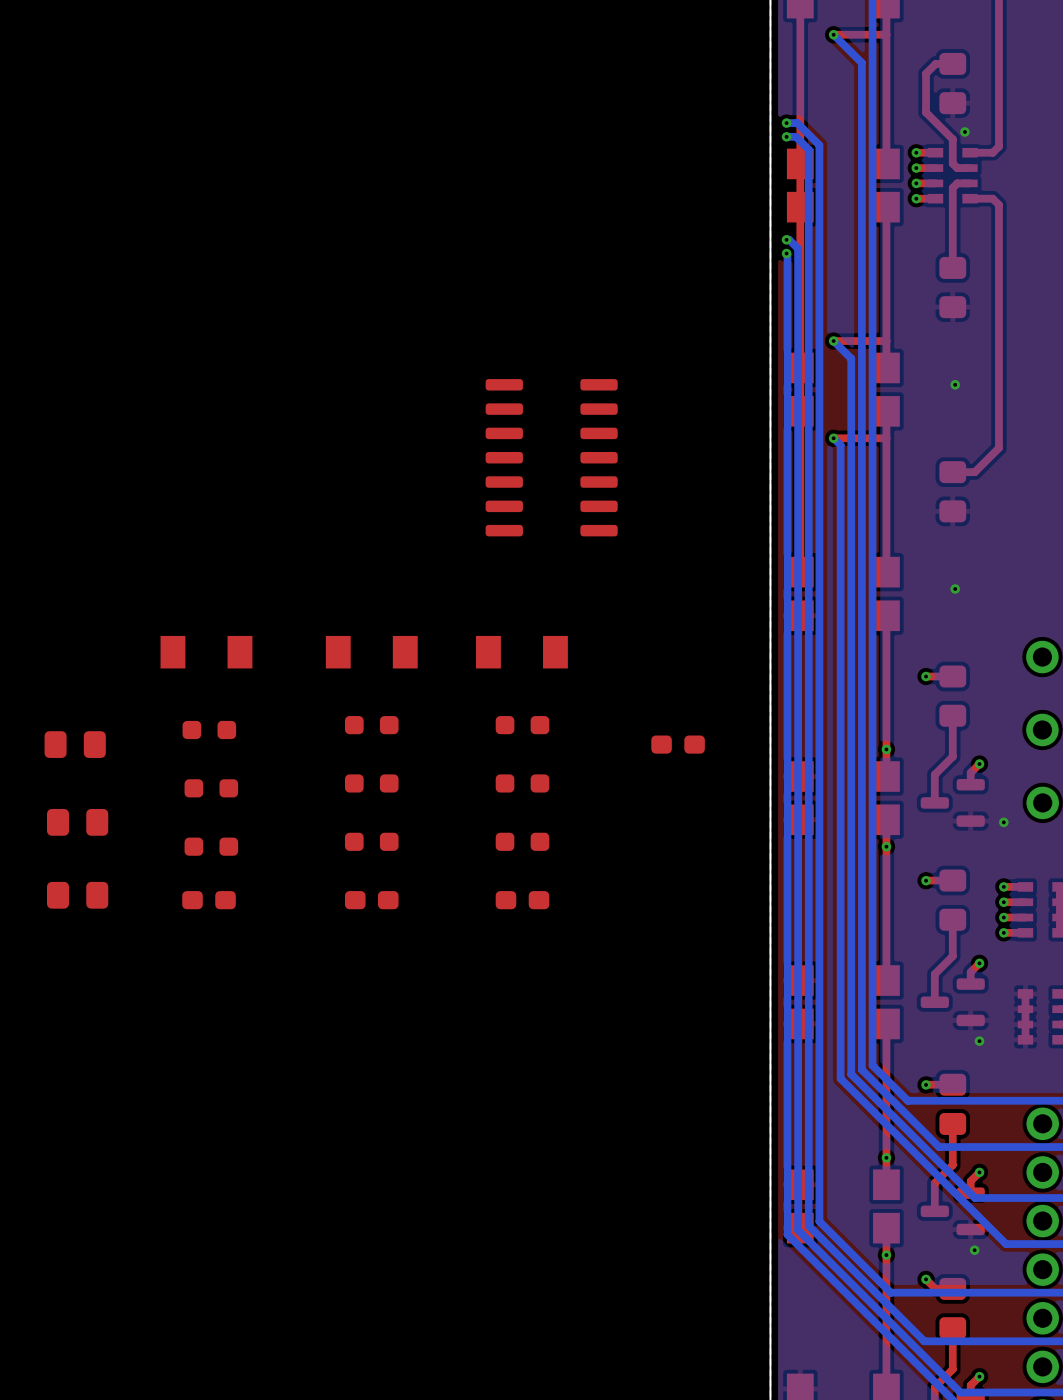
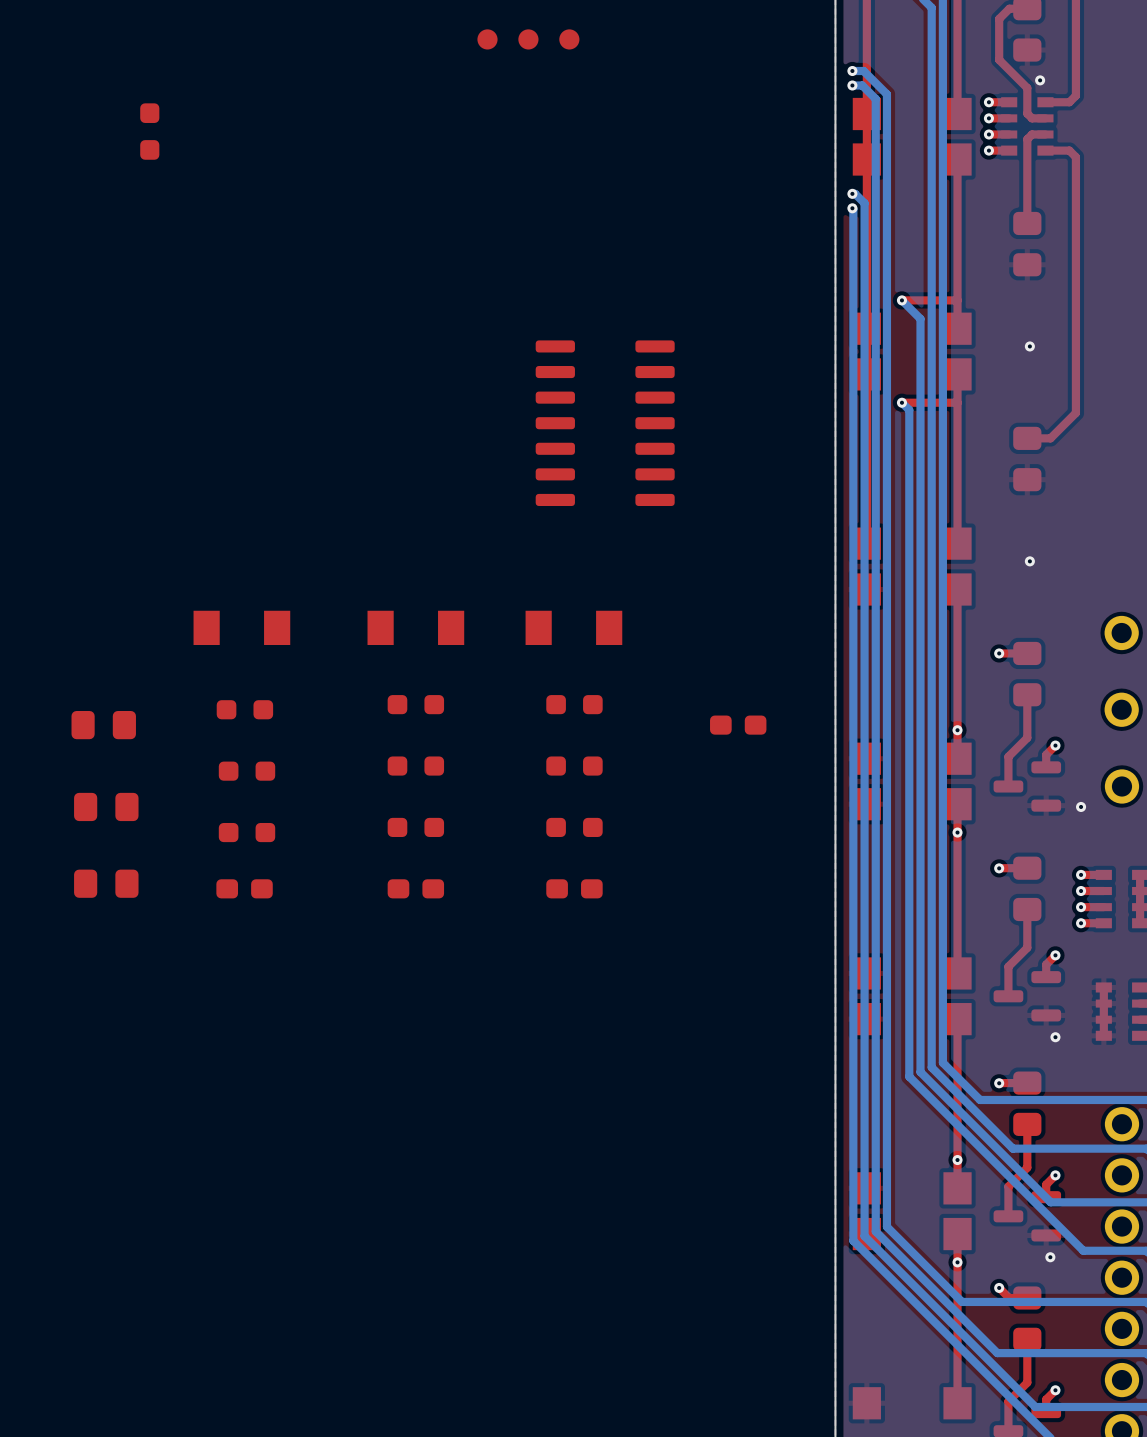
part: none -> (487, 39)
part: none -> (528, 39)
part: none -> (569, 39)
part: none -> (149, 131)

